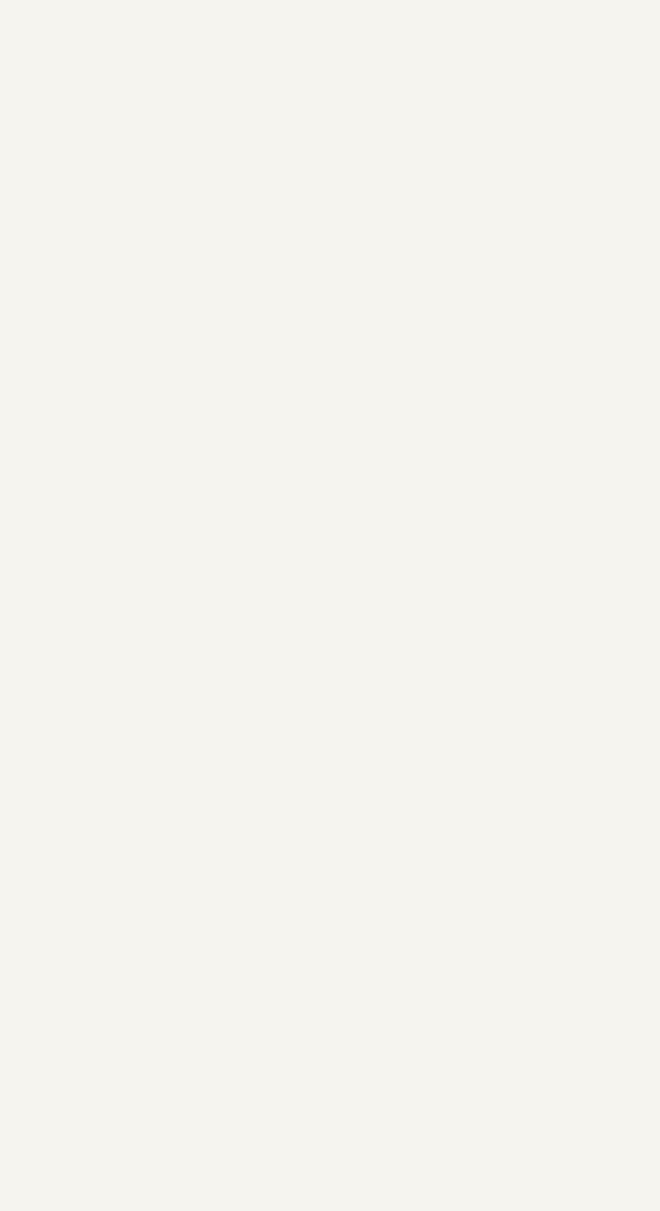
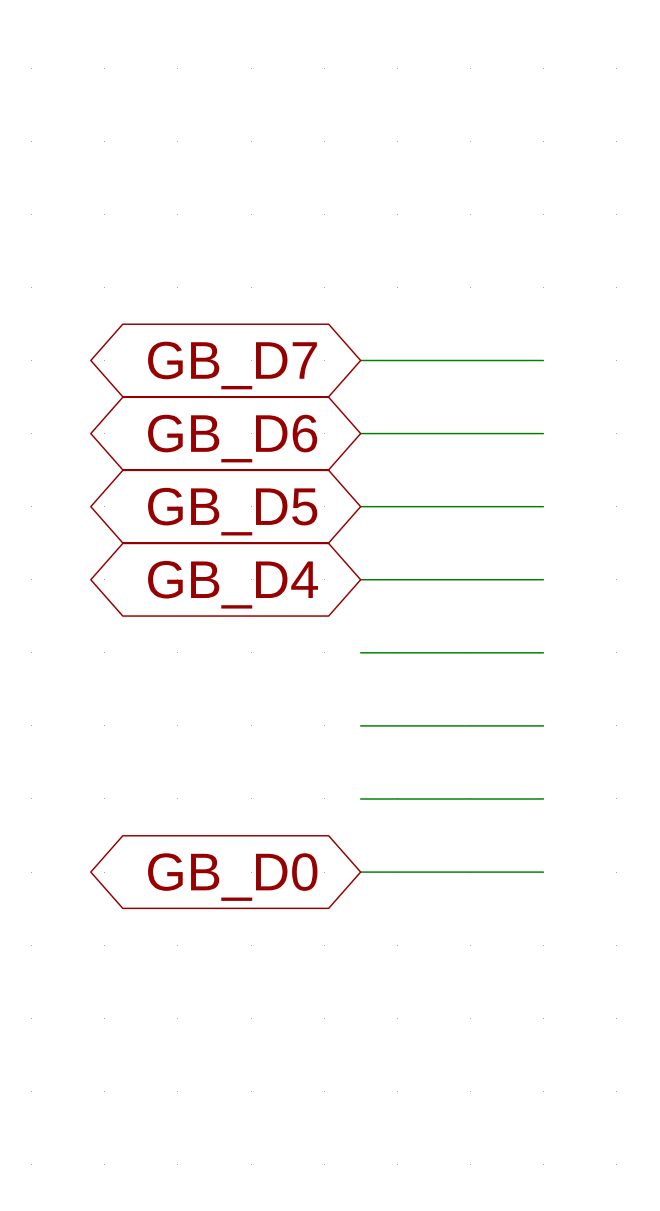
wire: none -> (360, 360) (543, 360)
global label: none -> GB_D7 (232, 365)
wire: none -> (360, 433) (543, 433)
global label: none -> GB_D6 (232, 438)
wire: none -> (360, 506) (543, 506)
global label: none -> GB_D5 (232, 511)
wire: none -> (360, 579) (543, 579)
global label: none -> GB_D4 (233, 584)
wire: none -> (360, 652) (543, 652)
wire: none -> (360, 725) (543, 725)
wire: none -> (360, 798) (543, 798)
wire: none -> (360, 872) (543, 872)
global label: none -> GB_D0 (232, 877)

